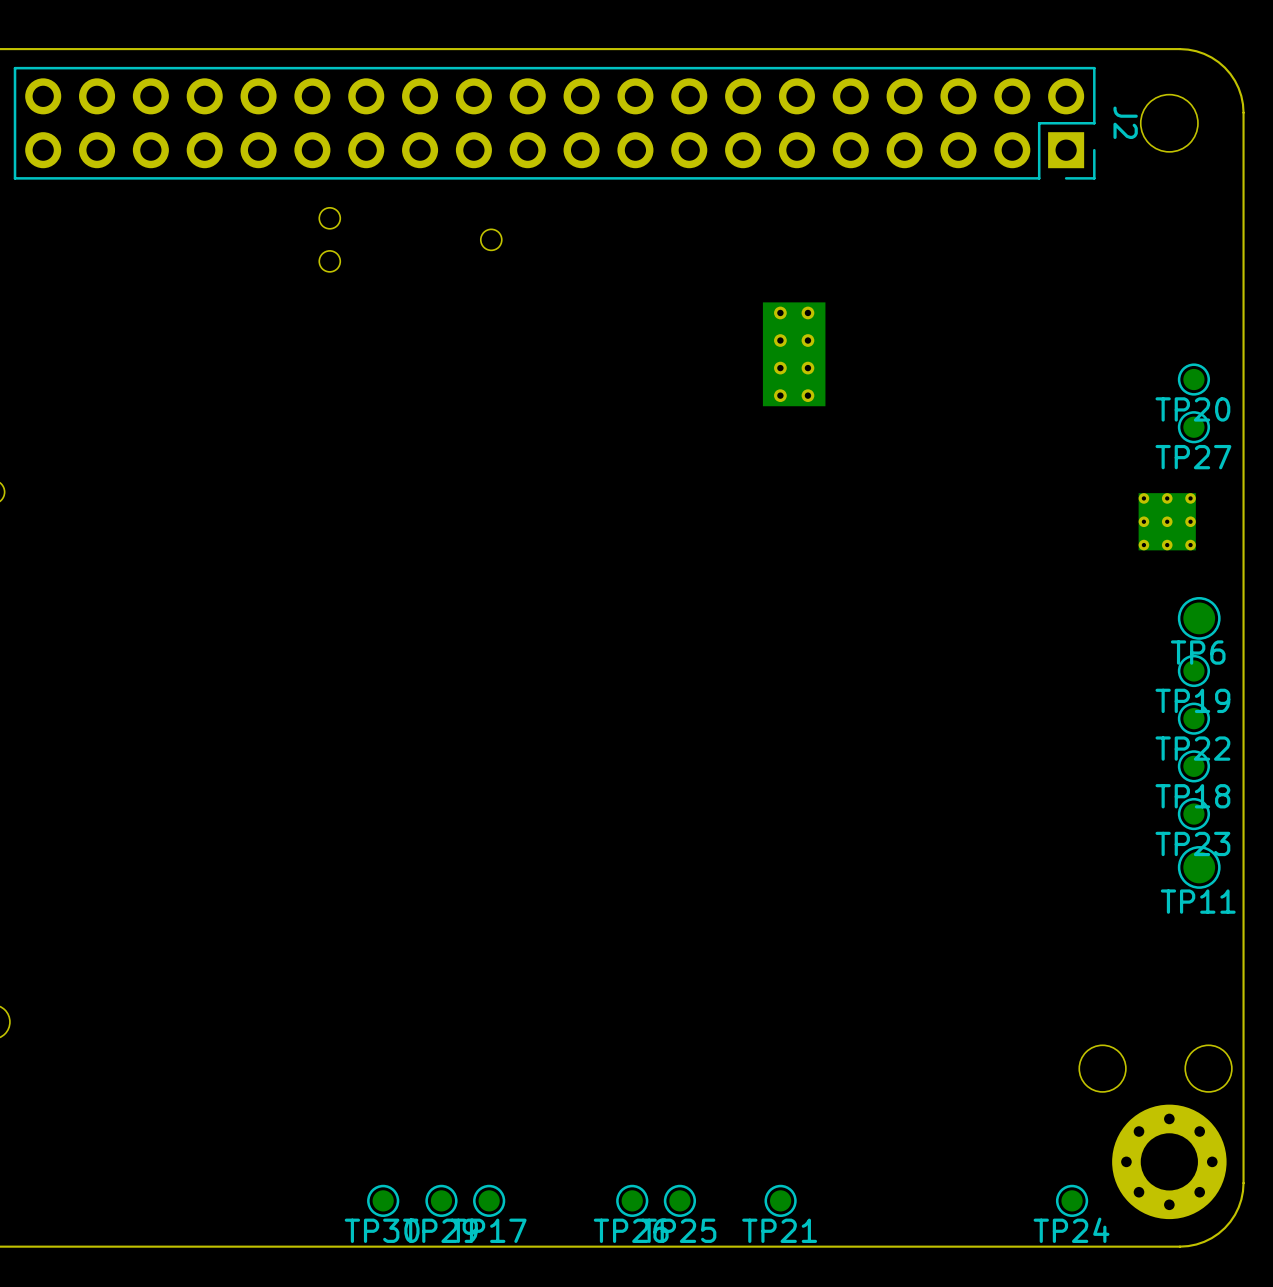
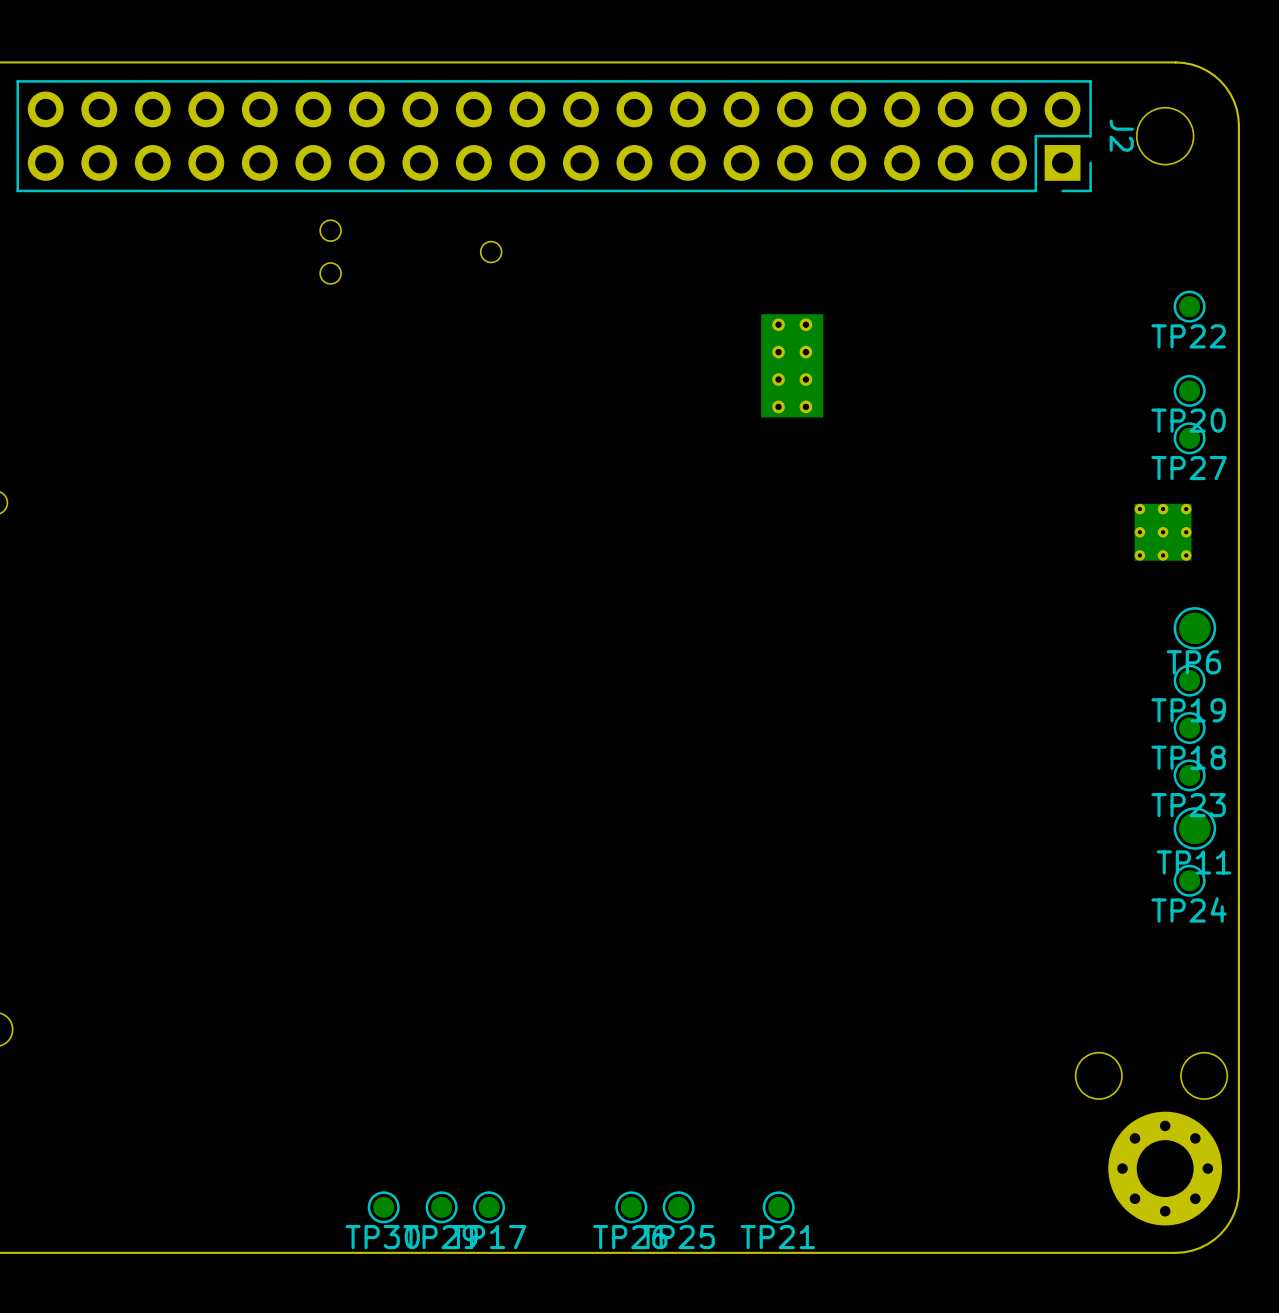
TP22: none -> (1189, 306)
TP22 name: TP22 (1192, 748) -> TP18 (1188, 757)
TP18 name: TP18 (1192, 796) -> TP23 (1188, 805)
TP23: (1193, 814) -> none
TP11 position: (1199, 867) -> (1194, 828)
TP24 position: (1072, 1200) -> (1189, 880)

